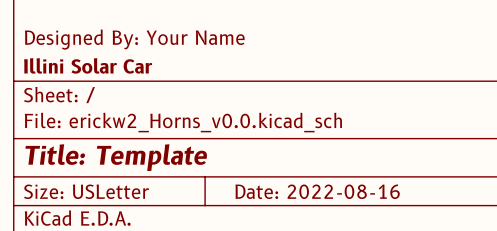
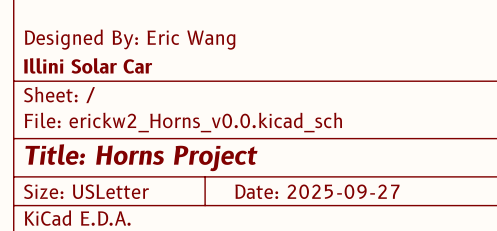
title block: Designed By: Your Name (134, 39) -> Designed By: Eric Wang (130, 39)
title block: Title: Template (116, 157) -> Title: Horns Project (141, 157)
title block: Date: 2022-08-16 (317, 191) -> Date: 2025-09-27 (317, 191)

